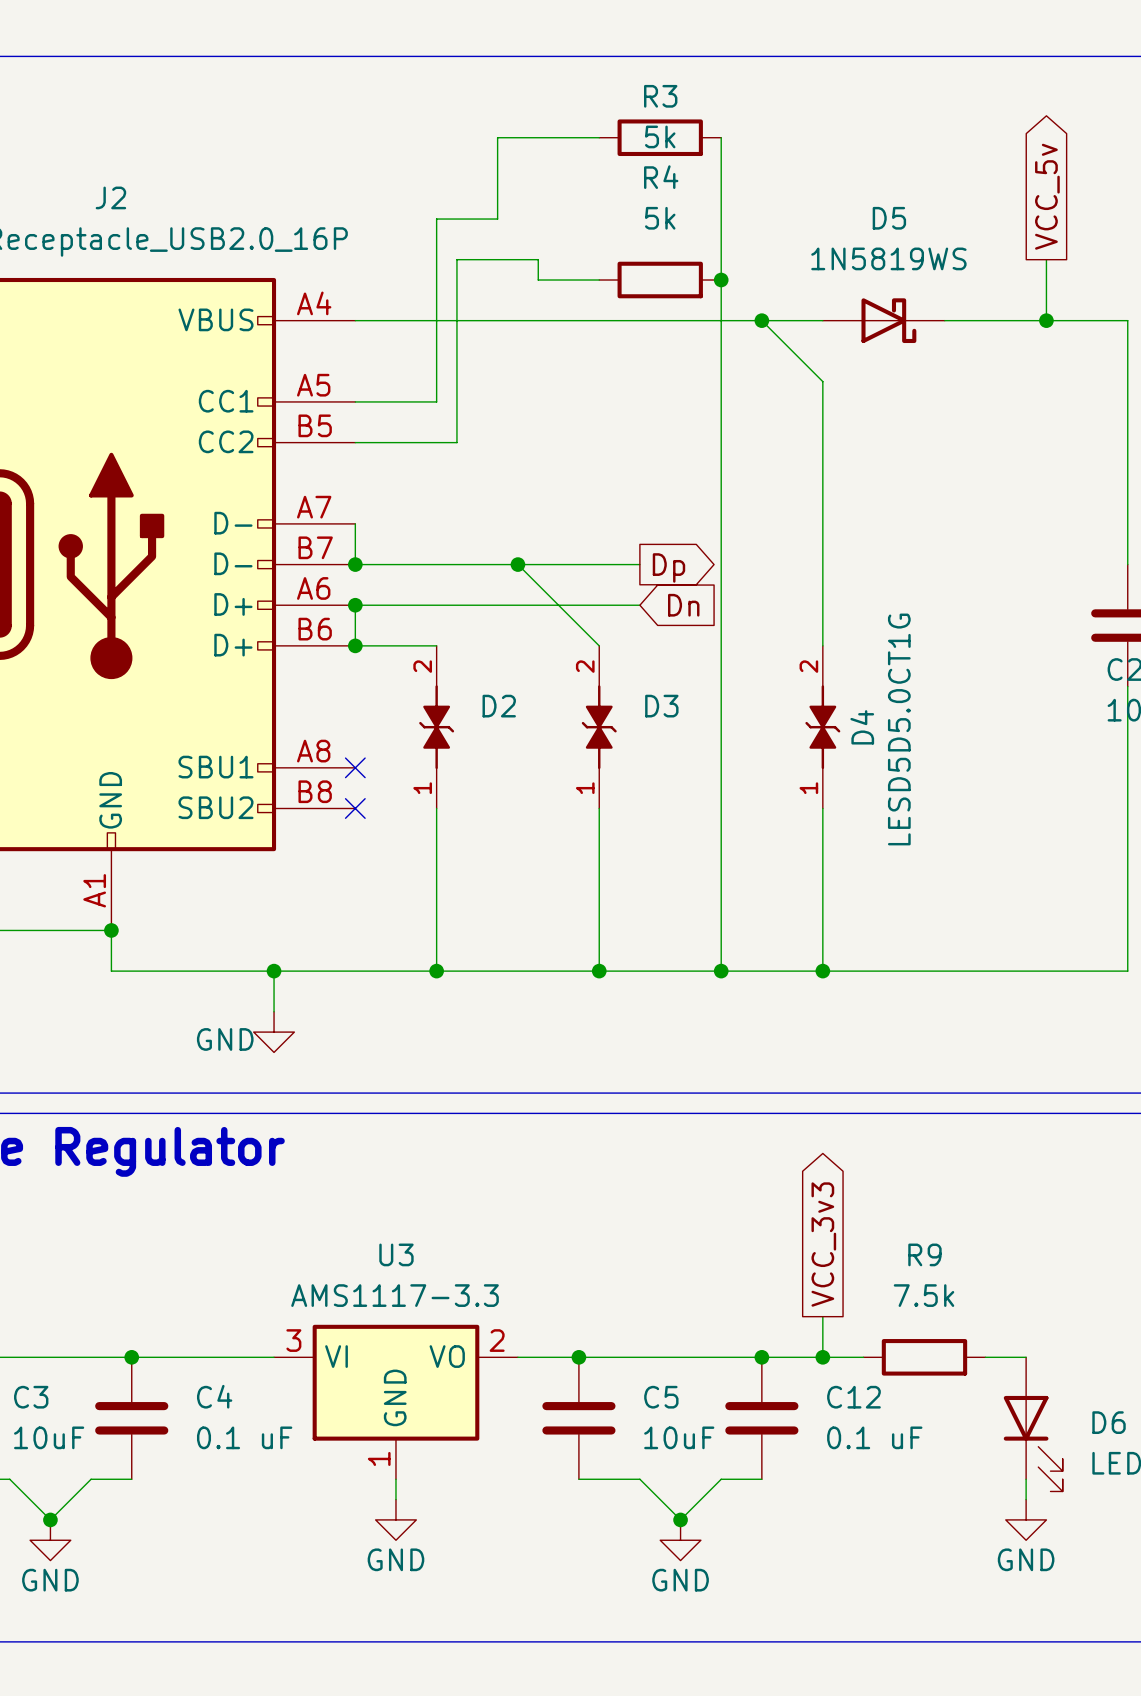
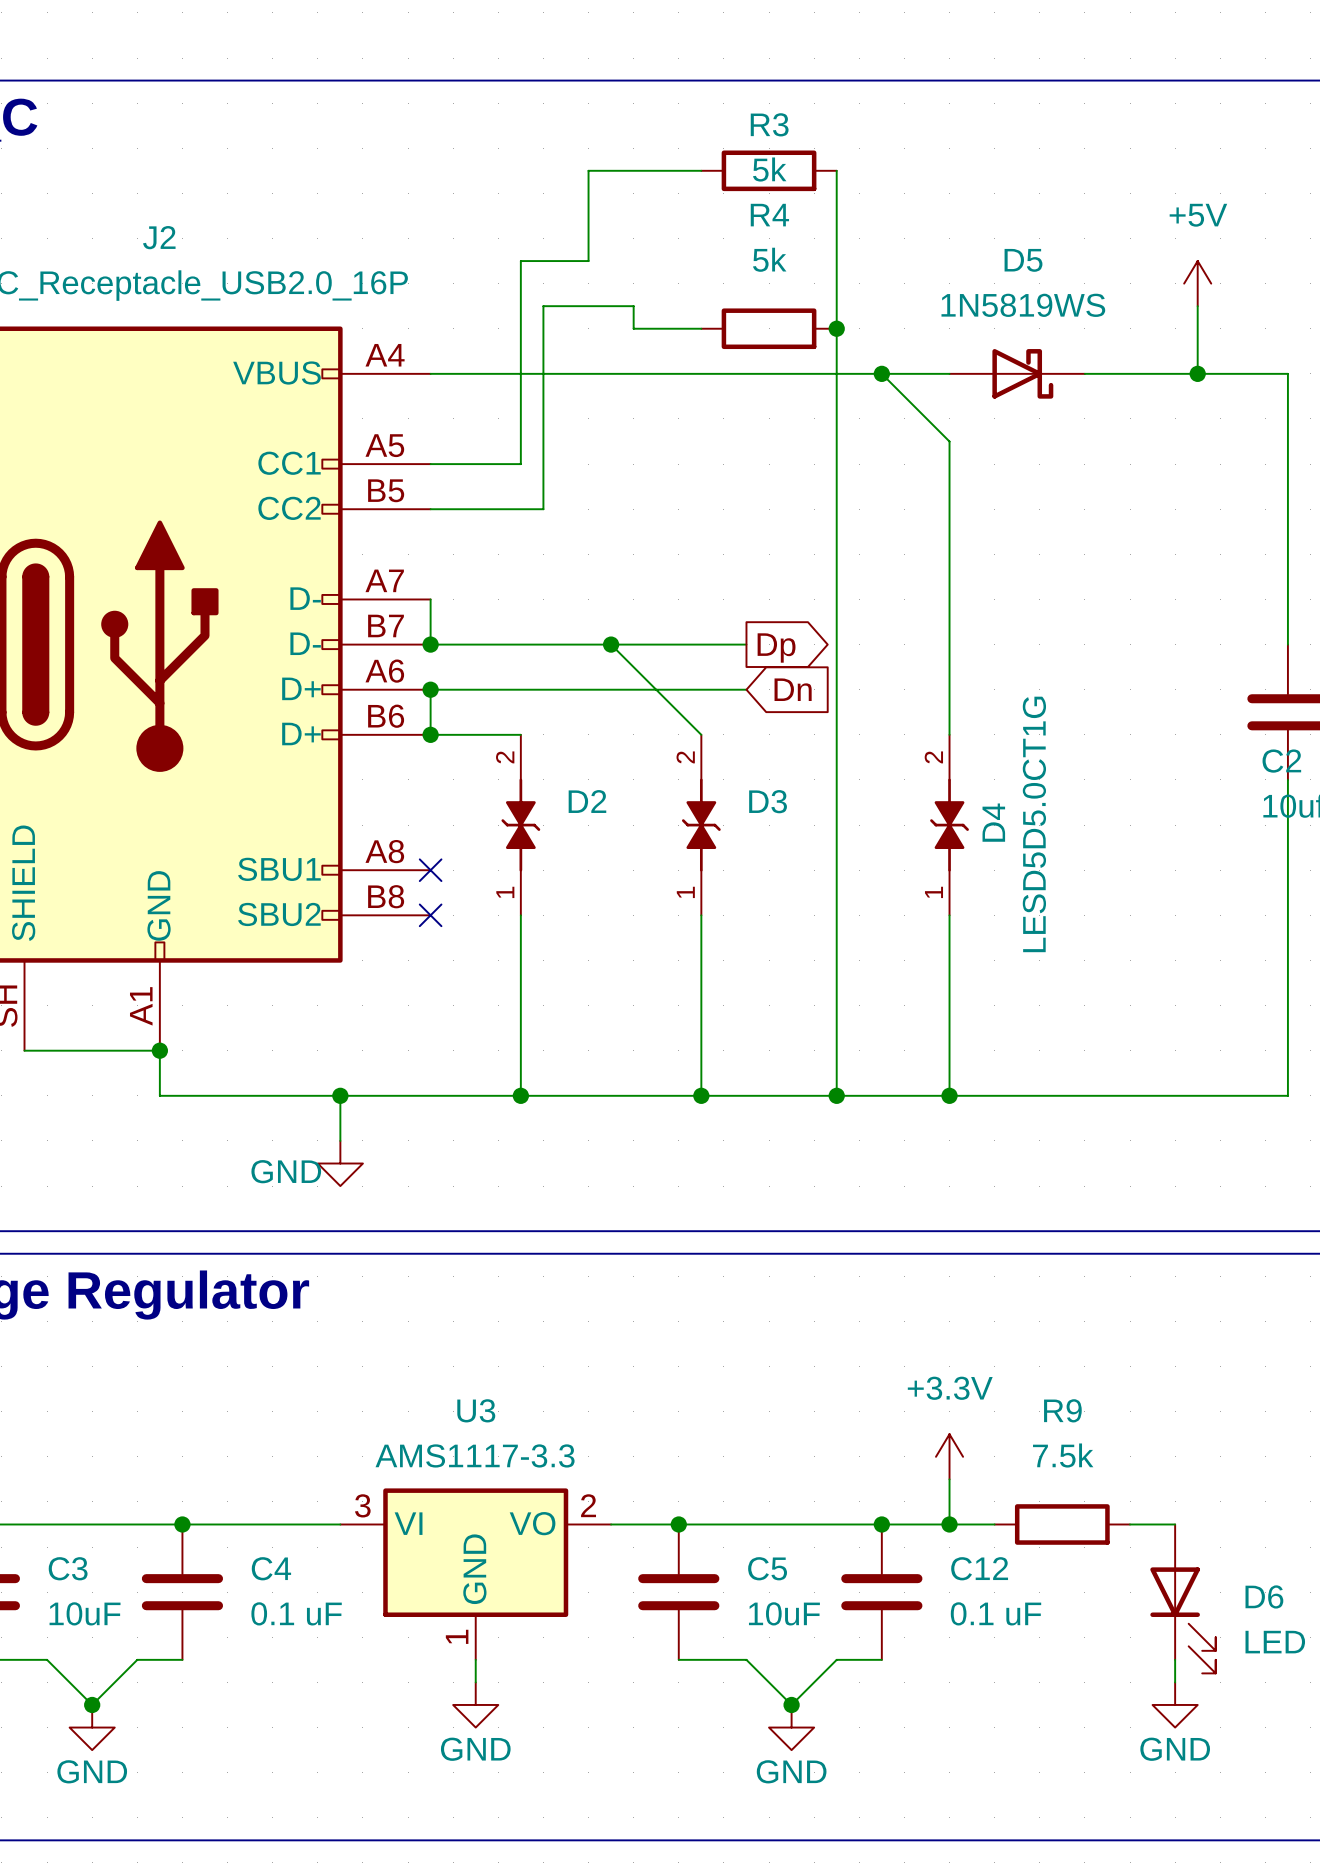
global label: VCC_5v (1047, 196) -> none
power symbol: none -> +5V (1197, 283)
global label: VCC_3v3 (823, 1244) -> none
power symbol: none -> +3.3V (949, 1456)

